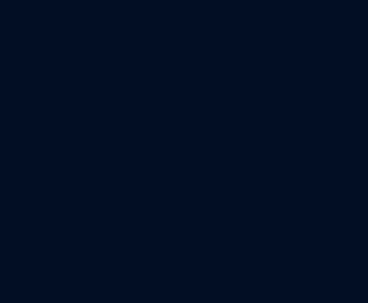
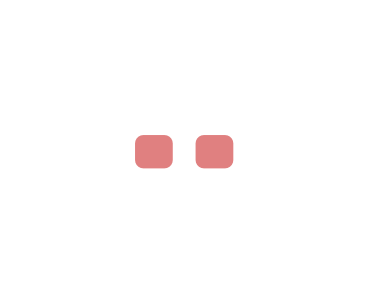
part: none -> (184, 151)

